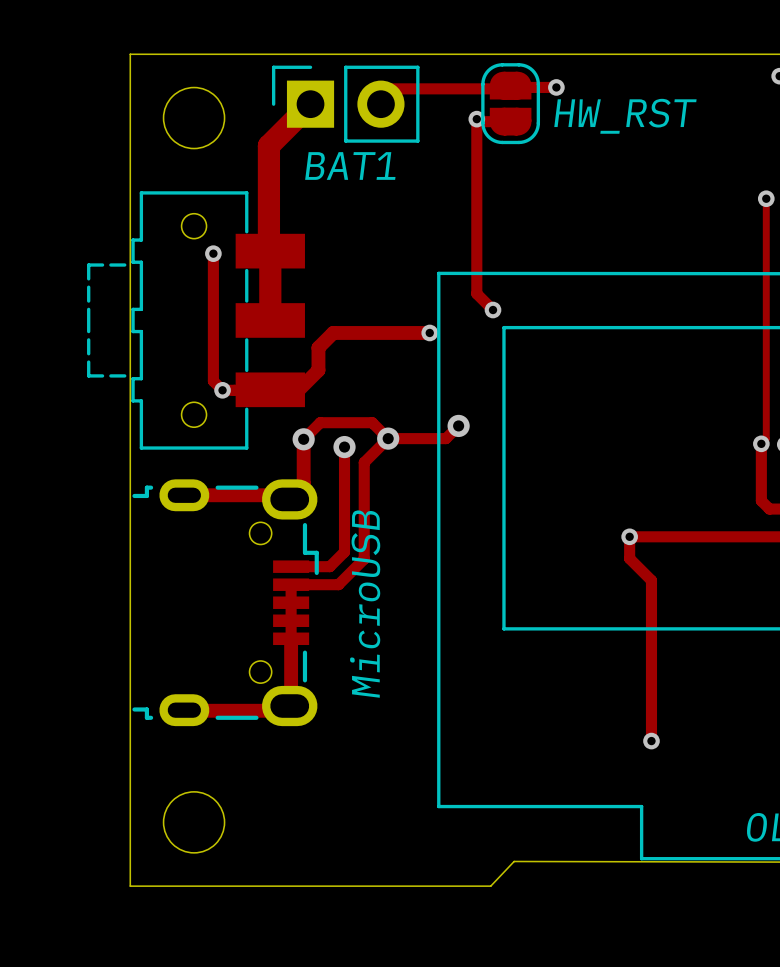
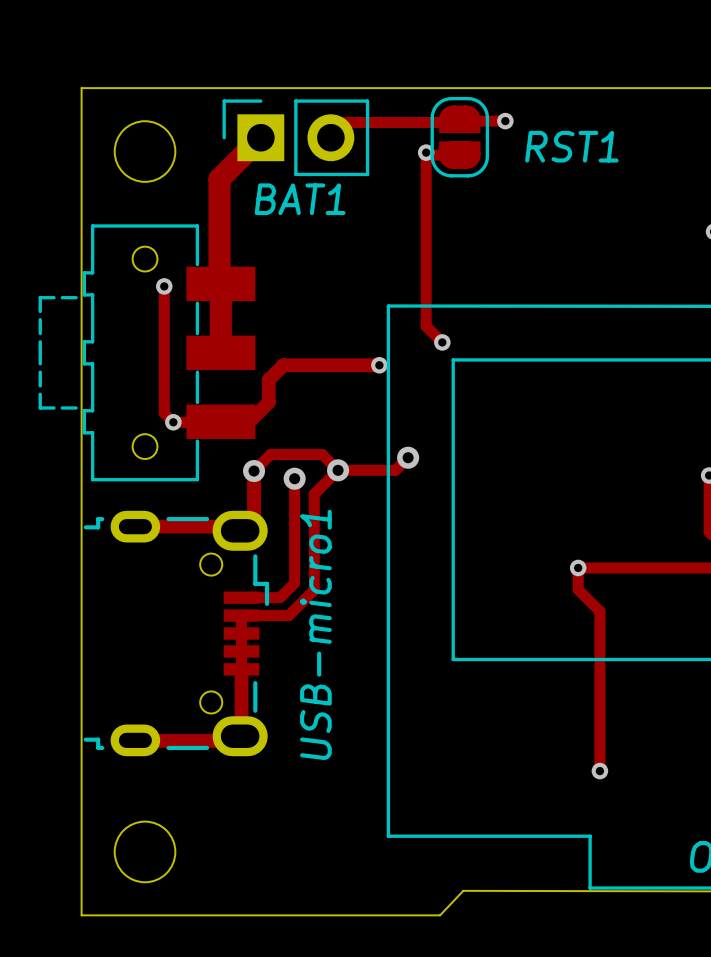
HW_RST name: HW_RST (625, 116) -> RST1 (571, 146)
MicroUSB name: MicroUSB (365, 603) -> USB-micro1 (315, 634)

